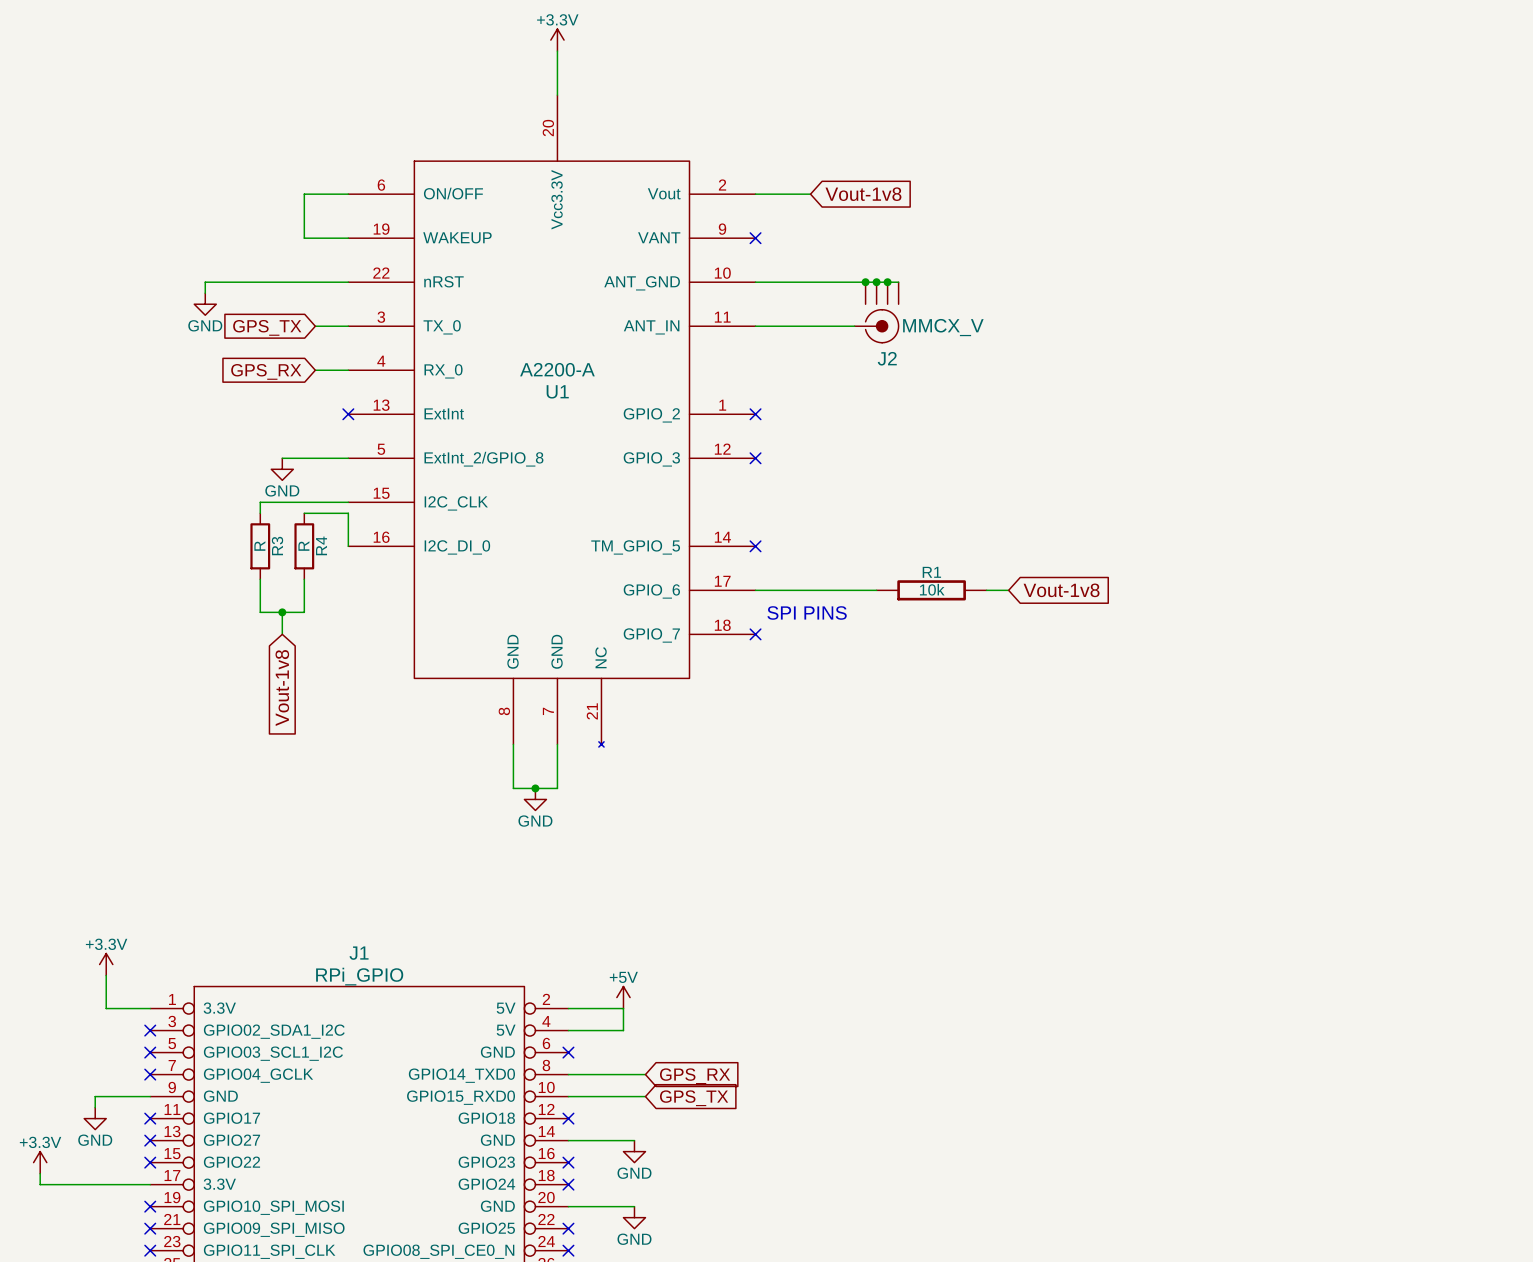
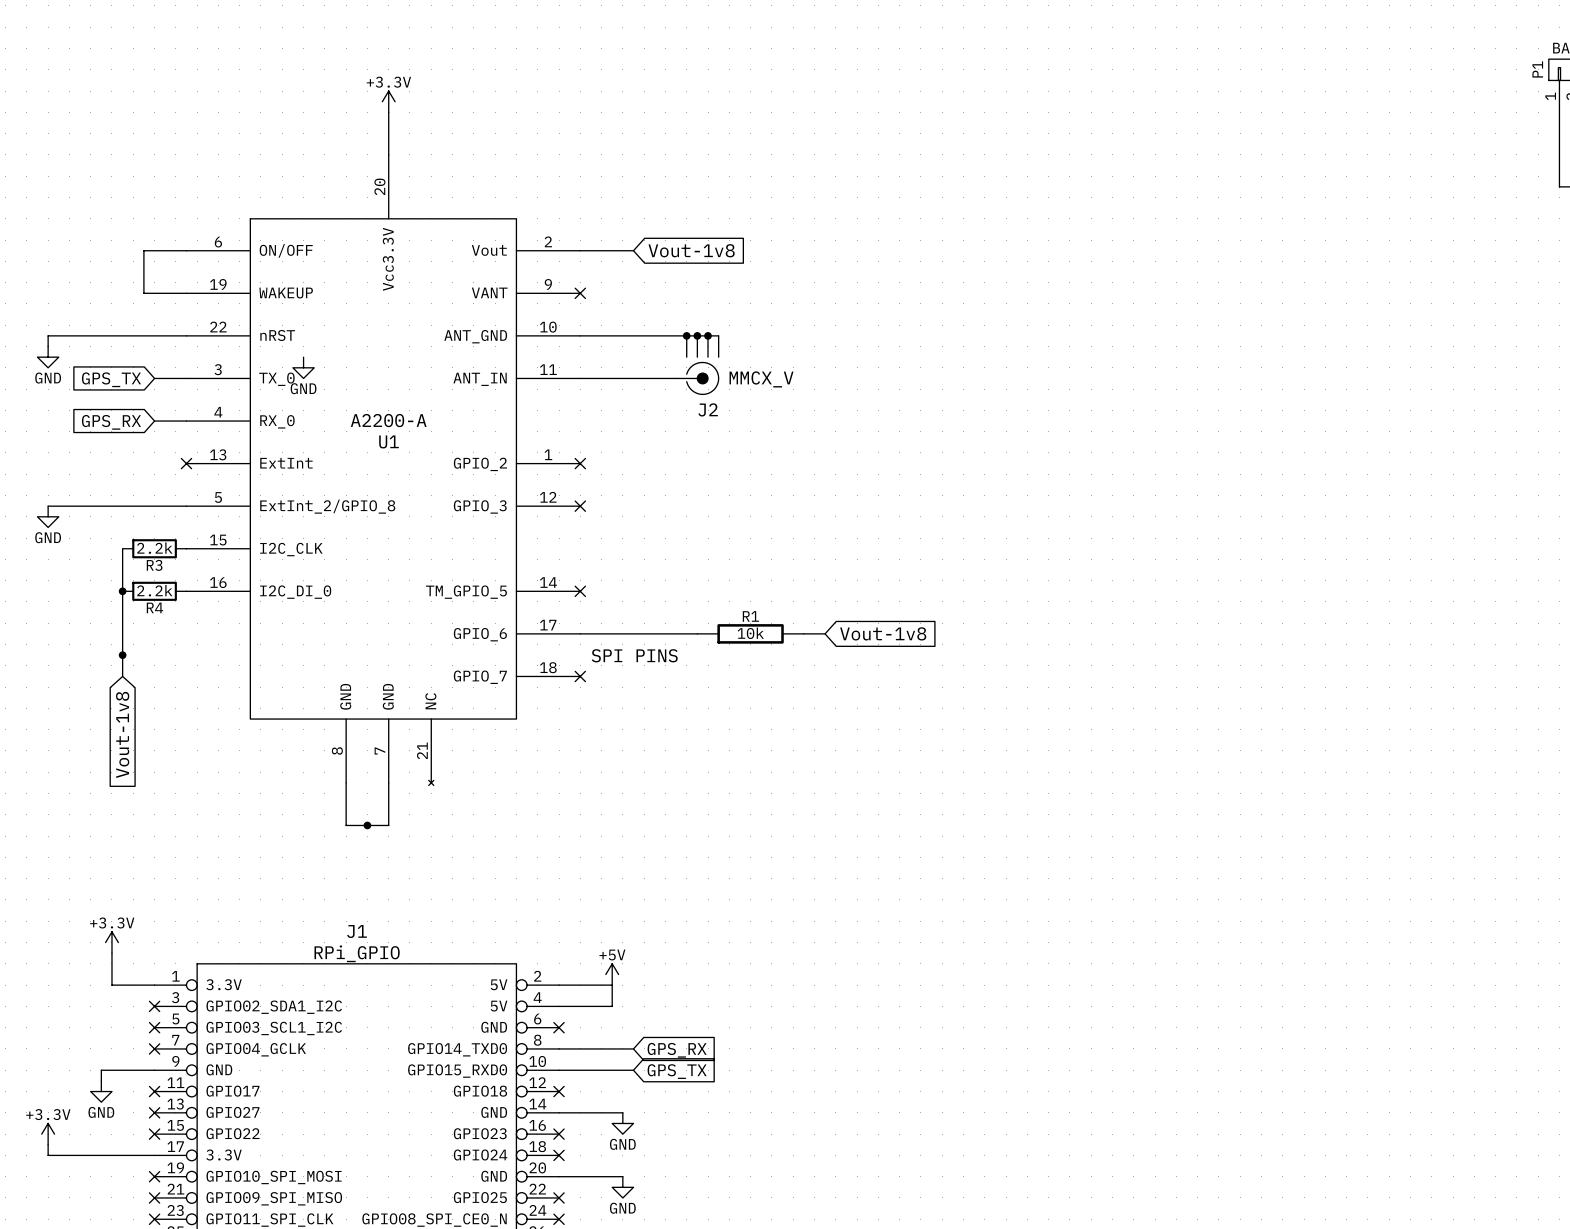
power symbol position: +3.3V (557, 40) -> +3.3V (388, 101)
wire: (557, 51) (557, 95) -> (388, 112) (388, 154)
wire: (348, 194) (304, 194) (304, 238) (348, 238) -> (186, 250) (143, 250) (143, 293) (186, 293)
wire: (755, 194) (810, 194) -> (580, 250) (633, 250)
global label position: Vout-1v8 (863, 194) -> Vout-1v8 (691, 250)
no-connect mark: (755, 238) -> none
wire: (348, 282) (205, 282) (205, 293) -> (186, 335) (48, 335) (48, 346)
wire: (755, 282) (898, 282) -> (580, 335) (718, 335)
junction: (865, 282) -> none
junction: (876, 282) -> none
junction: (887, 282) -> none
no-connect mark: none -> (580, 293)
power symbol: GND (205, 304) -> none
J2 position: (876, 312) -> (697, 365)
wire: (315, 326) (348, 326) -> (154, 378) (186, 378)
wire: (755, 326) (854, 326) -> (580, 378) (676, 378)
global label position: GPS_TX (267, 327) -> GPS_TX (111, 379)
junction: none -> (686, 335)
junction: none -> (697, 335)
junction: none -> (708, 335)
power symbol: none -> GND (48, 357)
power symbol: none -> GND (303, 367)
wire: (315, 370) (348, 370) -> (154, 421) (186, 421)
global label position: GPS_RX (266, 371) -> GPS_RX (111, 422)
no-connect mark: (348, 414) -> none
no-connect mark: (755, 414) -> none
U1 position: (551, 421) -> (383, 470)
wire: (282, 458) (348, 458) -> none
no-connect mark: (755, 458) -> none
no-connect mark: none -> (186, 463)
power symbol: GND (282, 469) -> none
no-connect mark: none -> (580, 463)
wire: (348, 502) (260, 502) (260, 513) -> none
wire: none -> (48, 506) (186, 506)
wire: (304, 513) (348, 513) (348, 546) -> none
no-connect mark: none -> (580, 506)
power symbol: none -> GND (48, 516)
R3 value: R (259, 546) -> 2.2k (154, 548)
R3 rotation: 0° (260, 546) -> 90° clockwise (154, 548)
R3 position: (260, 546) -> (154, 548)
R4 value: R (303, 546) -> 2.2k (154, 590)
R4 rotation: 0° (304, 546) -> 90° clockwise (154, 591)
R4 position: (304, 546) -> (154, 591)
no-connect mark: (755, 546) -> none
wire: none -> (122, 548) (122, 676)
wire: (260, 579) (260, 612) (304, 612) (304, 579) -> none
wire: (755, 590) (876, 590) -> (580, 633) (697, 633)
R1 position: (931, 590) -> (750, 633)
wire: (986, 590) (1008, 590) -> (803, 633) (825, 633)
global label position: Vout-1v8 (1061, 590) -> Vout-1v8 (883, 633)
junction: none -> (122, 591)
no-connect mark: none -> (580, 591)
wire: (282, 612) (282, 634) -> none
junction: (282, 612) -> none
text position: SPI PINS (807, 612) -> SPI PINS (634, 655)
no-connect mark: (755, 634) -> none
junction: none -> (122, 655)
global label position: Vout-1v8 (282, 688) -> Vout-1v8 (122, 734)
no-connect mark: none -> (580, 676)
wire: (513, 744) (513, 788) (557, 788) (557, 744) -> (346, 782) (346, 825) (388, 825) (388, 782)
junction: (535, 788) -> none
power symbol: GND (535, 799) -> none
junction: none -> (367, 825)

